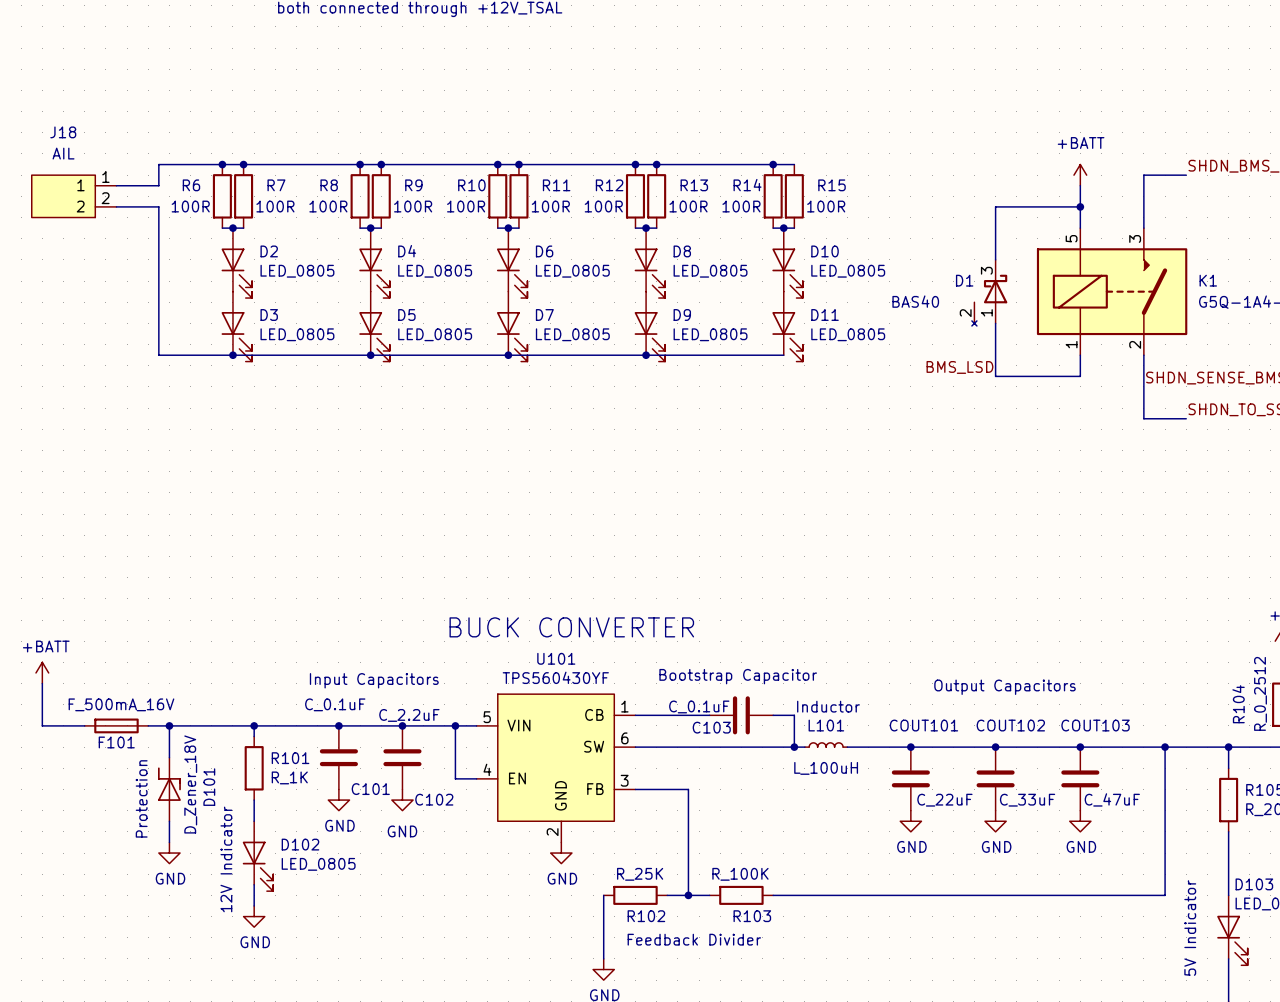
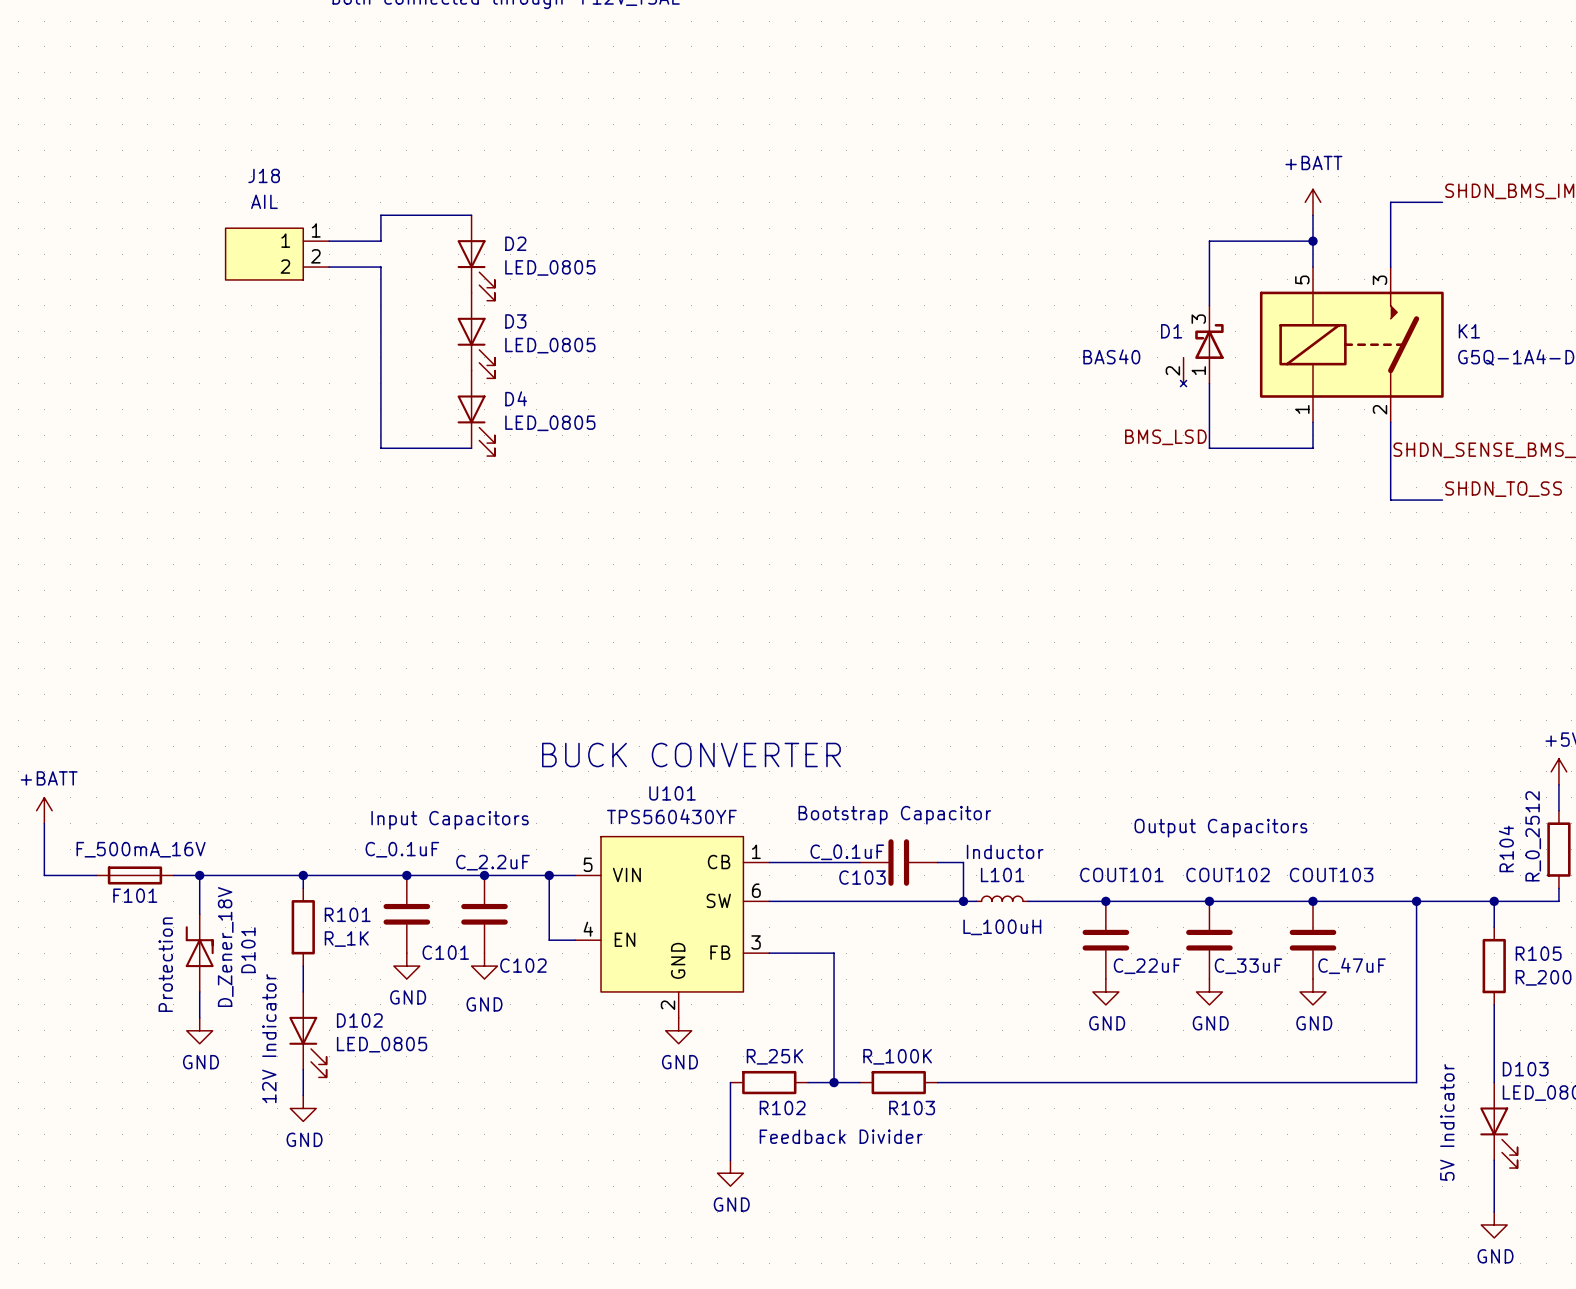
junction: (222, 164) -> none
junction: (243, 164) -> none
junction: (360, 164) -> none
junction: (381, 164) -> none
junction: (497, 164) -> none
junction: (518, 164) -> none
junction: (635, 164) -> none
junction: (656, 164) -> none
junction: (773, 164) -> none
wire: (794, 164) (158, 164) (158, 185) (116, 185) -> none
wire: none -> (471, 215) (380, 215) (380, 241) (329, 241)
J18 position: (74, 196) -> (277, 254)
R6: 100R (222, 196) -> none
R7: 100R (243, 196) -> none
R8: 100R (360, 196) -> none
R9: 100R (381, 196) -> none
R10: 100R (497, 196) -> none
R11: 100R (518, 196) -> none
R12: 100R (635, 196) -> none
R13: 100R (656, 196) -> none
R14: 100R (773, 196) -> none
R15: 100R (794, 196) -> none
wire: (116, 206) (158, 206) (158, 355) (783, 355) -> none
junction: (232, 228) -> none
wire: none -> (329, 267) (380, 267) (380, 448) (471, 448)
wire: (360, 228) (381, 228) -> none
junction: (370, 228) -> none
wire: (497, 228) (518, 228) -> none
junction: (508, 228) -> none
wire: (635, 228) (656, 228) -> none
junction: (646, 228) -> none
wire: (773, 228) (794, 228) -> none
junction: (783, 228) -> none
D2 position: (236, 263) -> (476, 257)
D4 position: (374, 263) -> (476, 413)
D6: LED_0805 (512, 263) -> none
D8: LED_0805 (649, 263) -> none
D10: LED_0805 (787, 263) -> none
D3 position: (236, 326) -> (476, 335)
D5: LED_0805 (374, 326) -> none
D7: LED_0805 (512, 326) -> none
D9: LED_0805 (649, 326) -> none
D11: LED_0805 (787, 326) -> none
junction: (232, 355) -> none
junction: (370, 355) -> none
junction: (508, 355) -> none
junction: (646, 355) -> none

